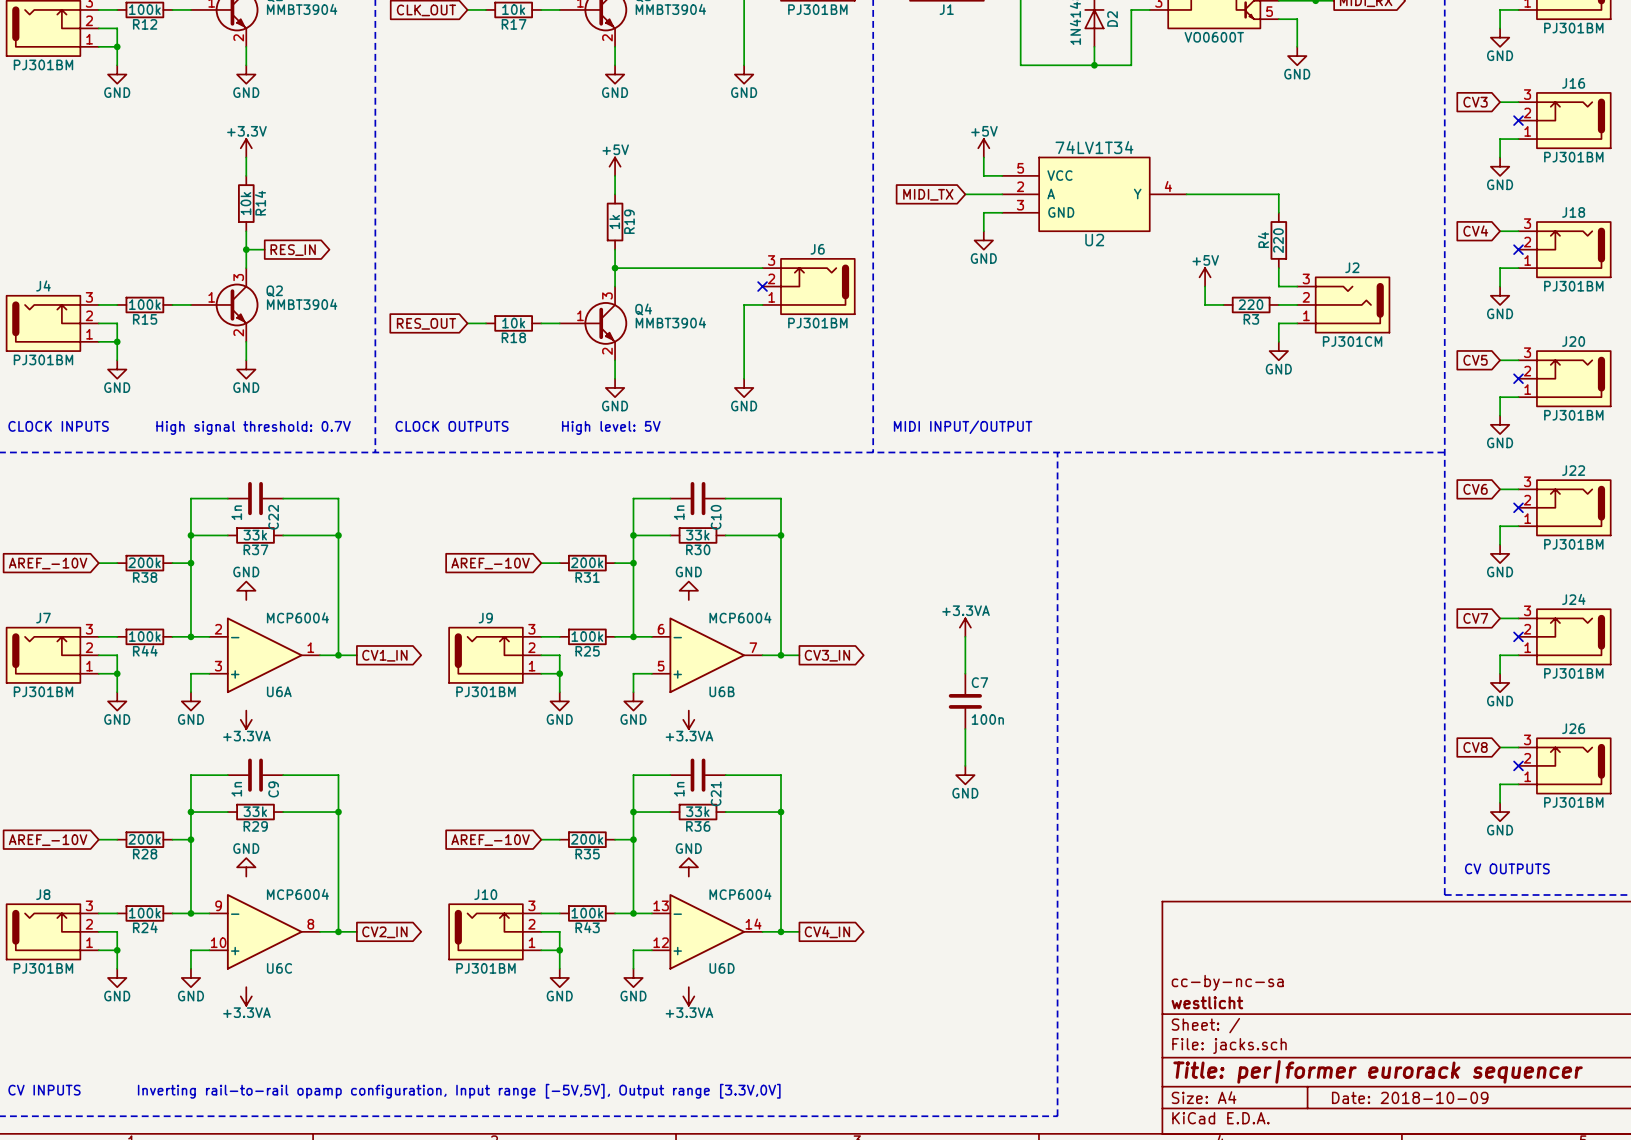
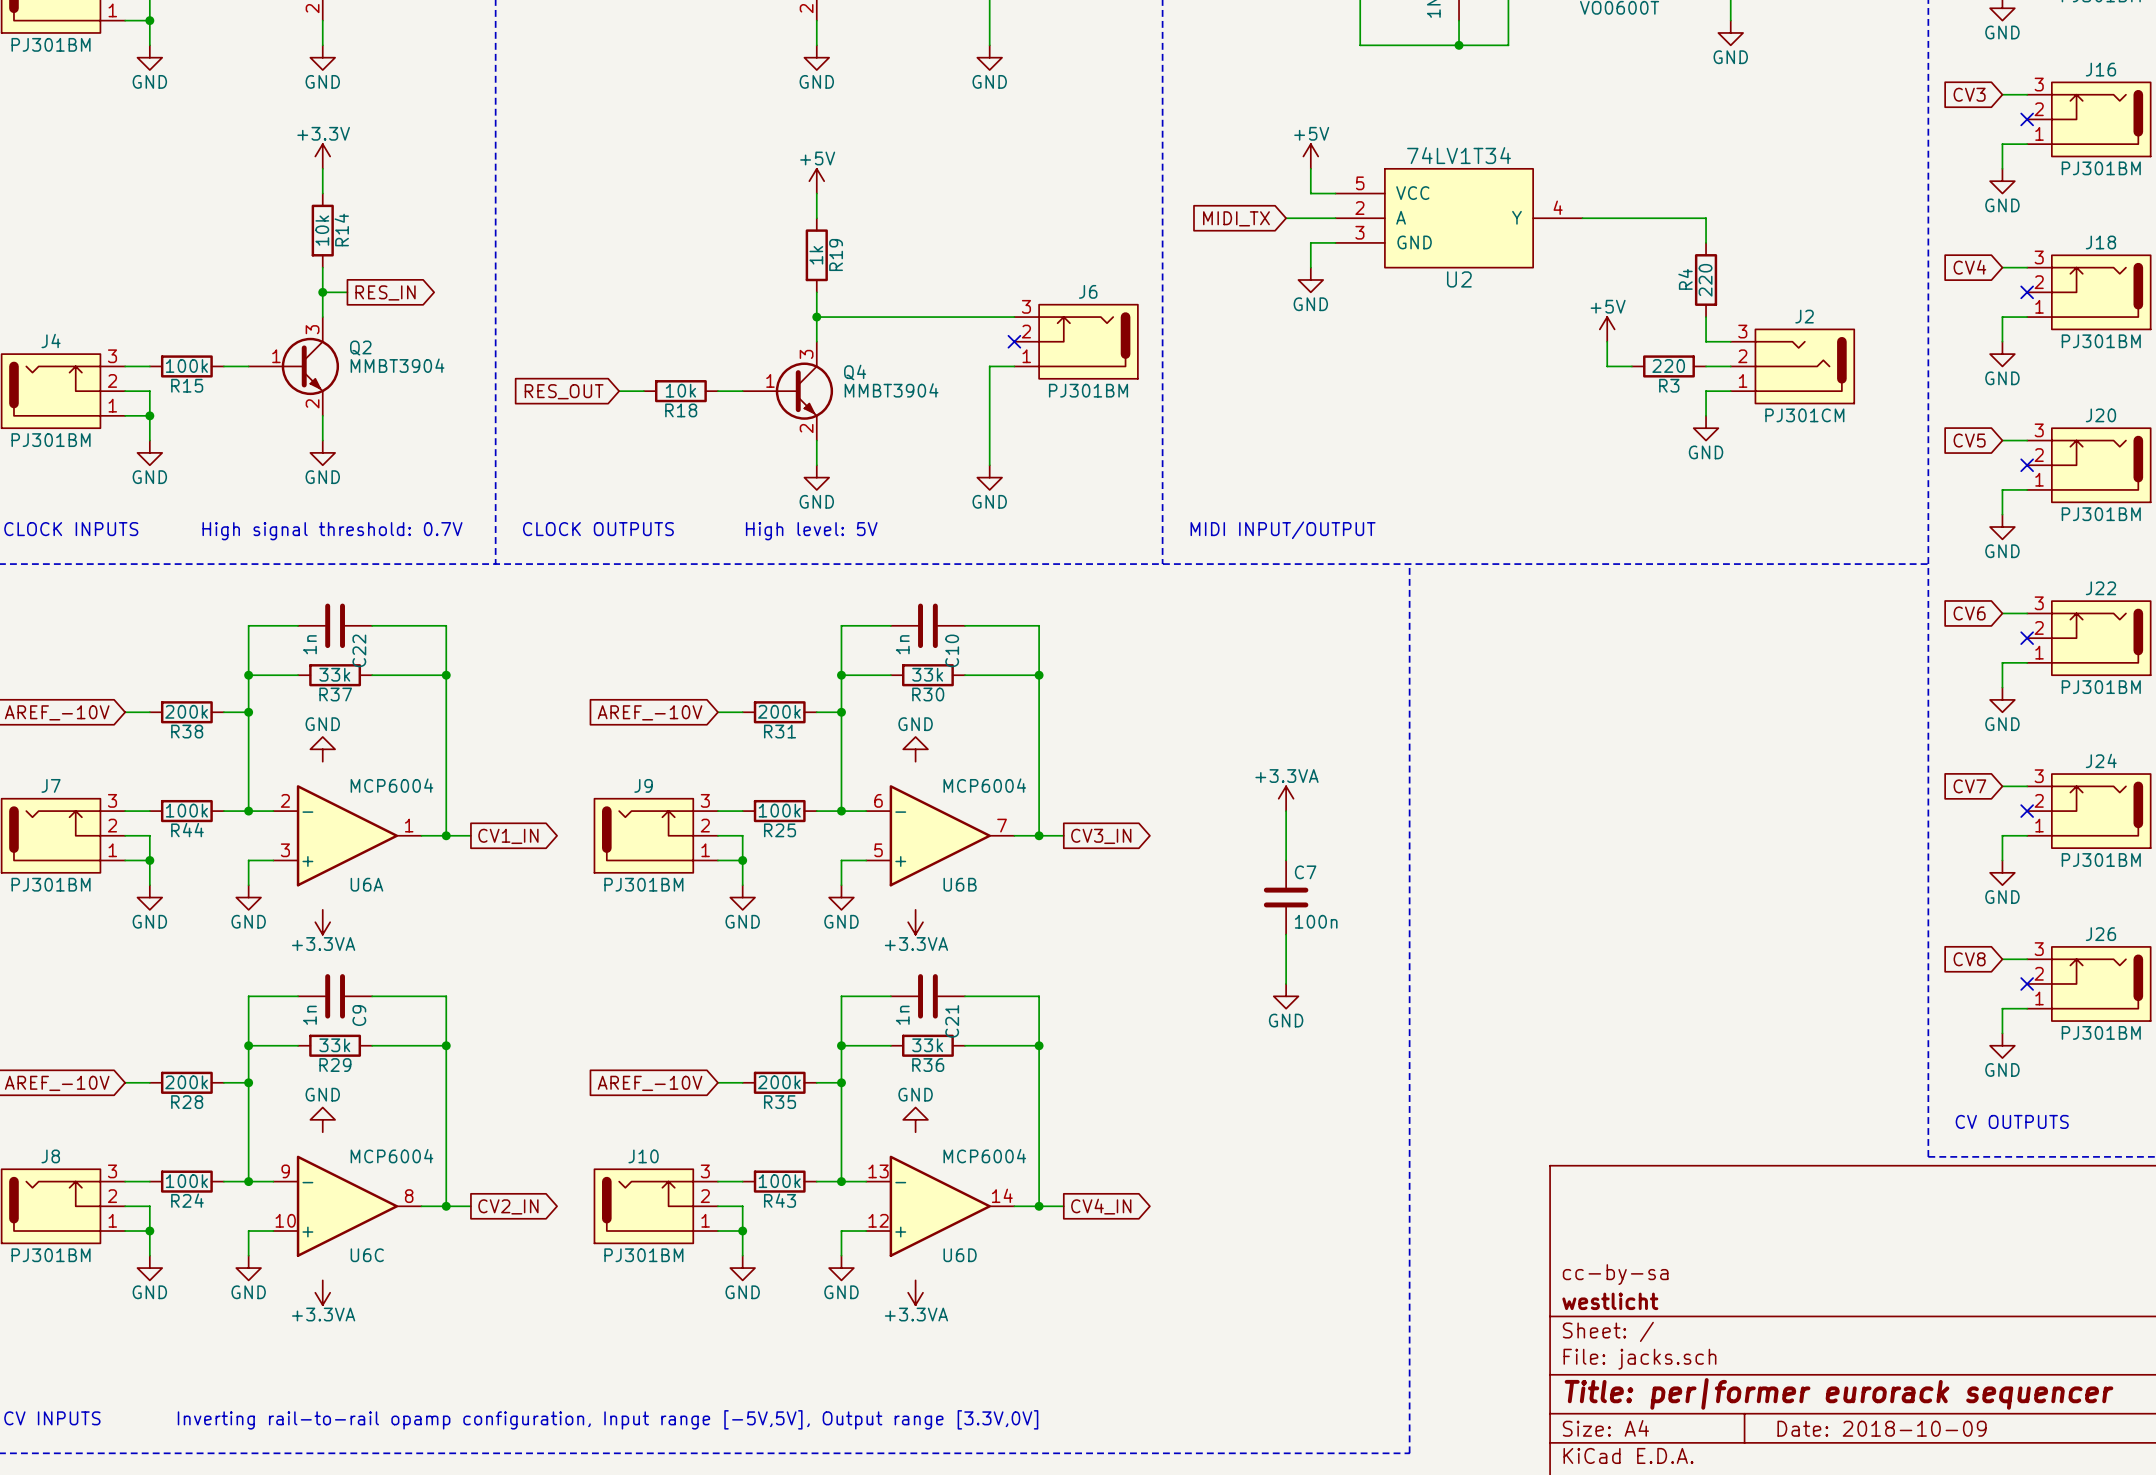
title block: cc-by-nc-sa (1227, 982) -> cc-by-sa (1615, 1274)

